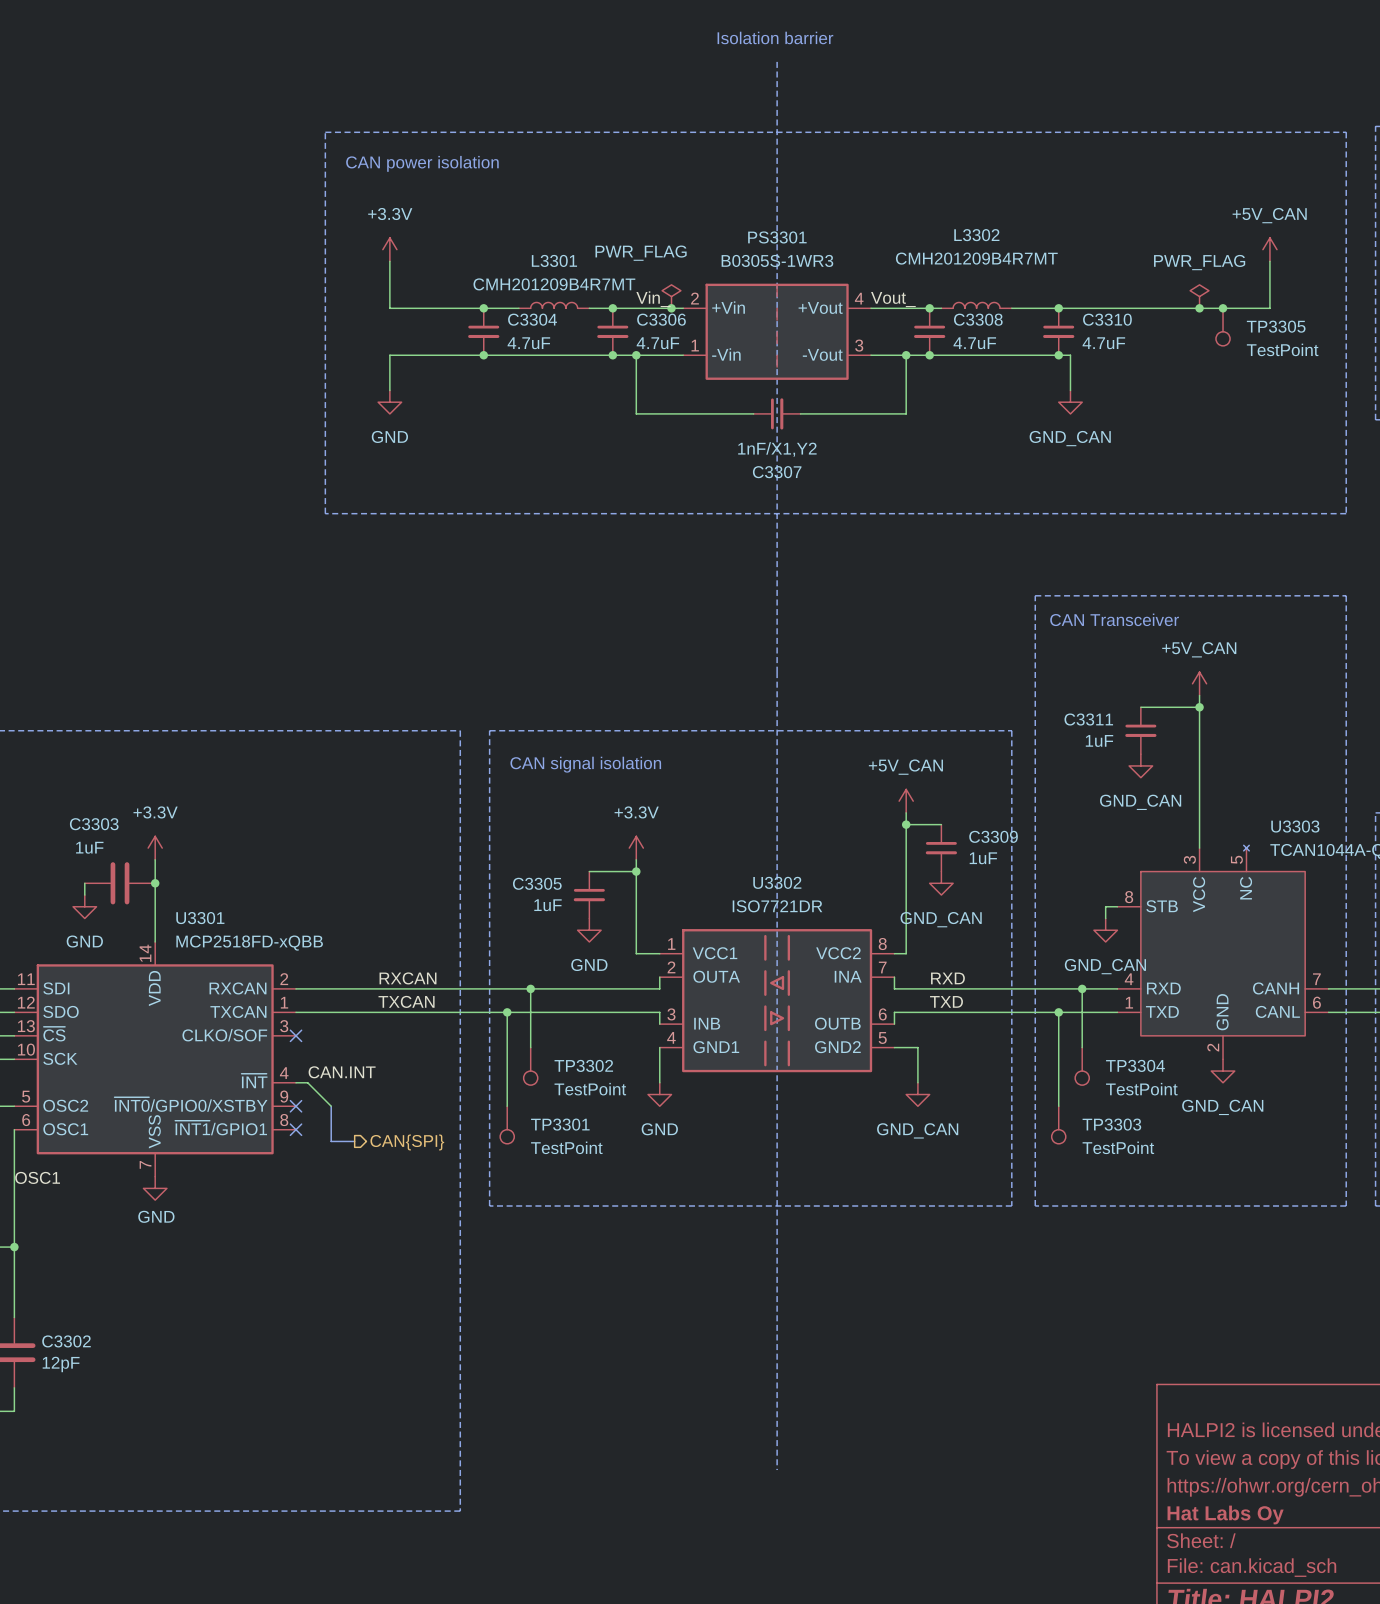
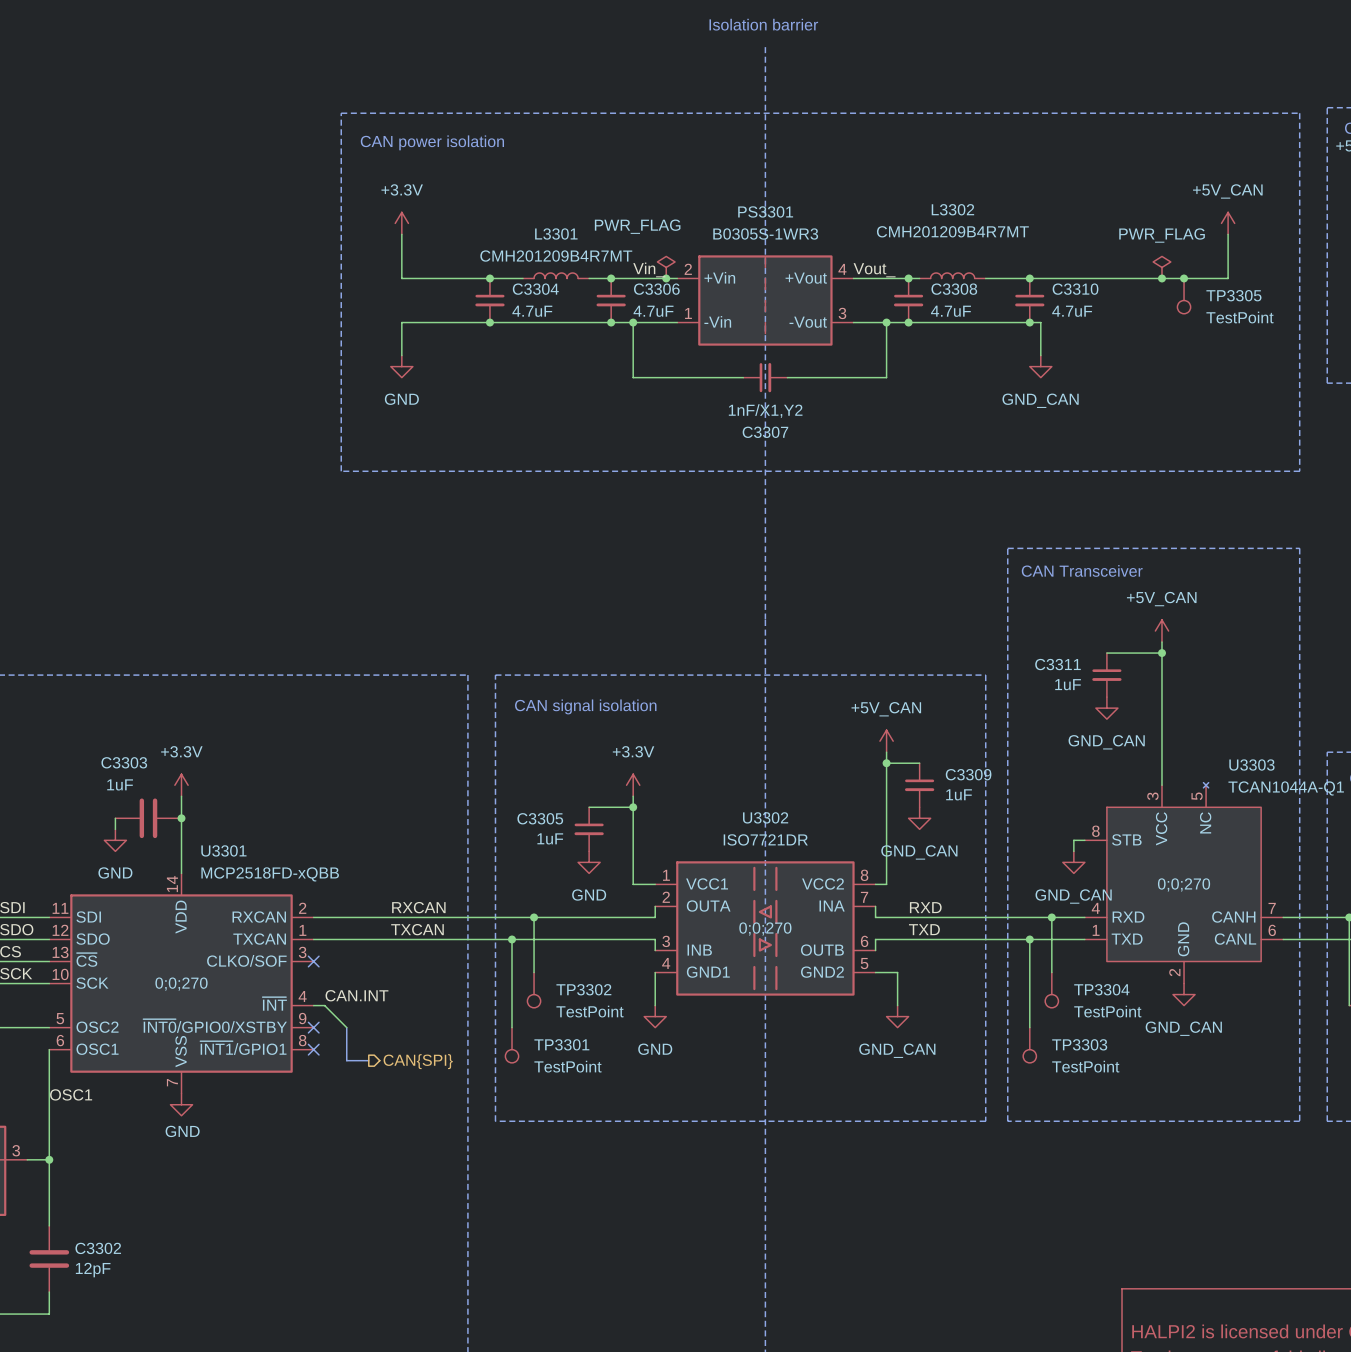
U3303 text: none -> 0;0;270 (1184, 884)
U3302 text: none -> 0;0;270 (765, 929)
U3301 text: none -> 0;0;270 (181, 984)

